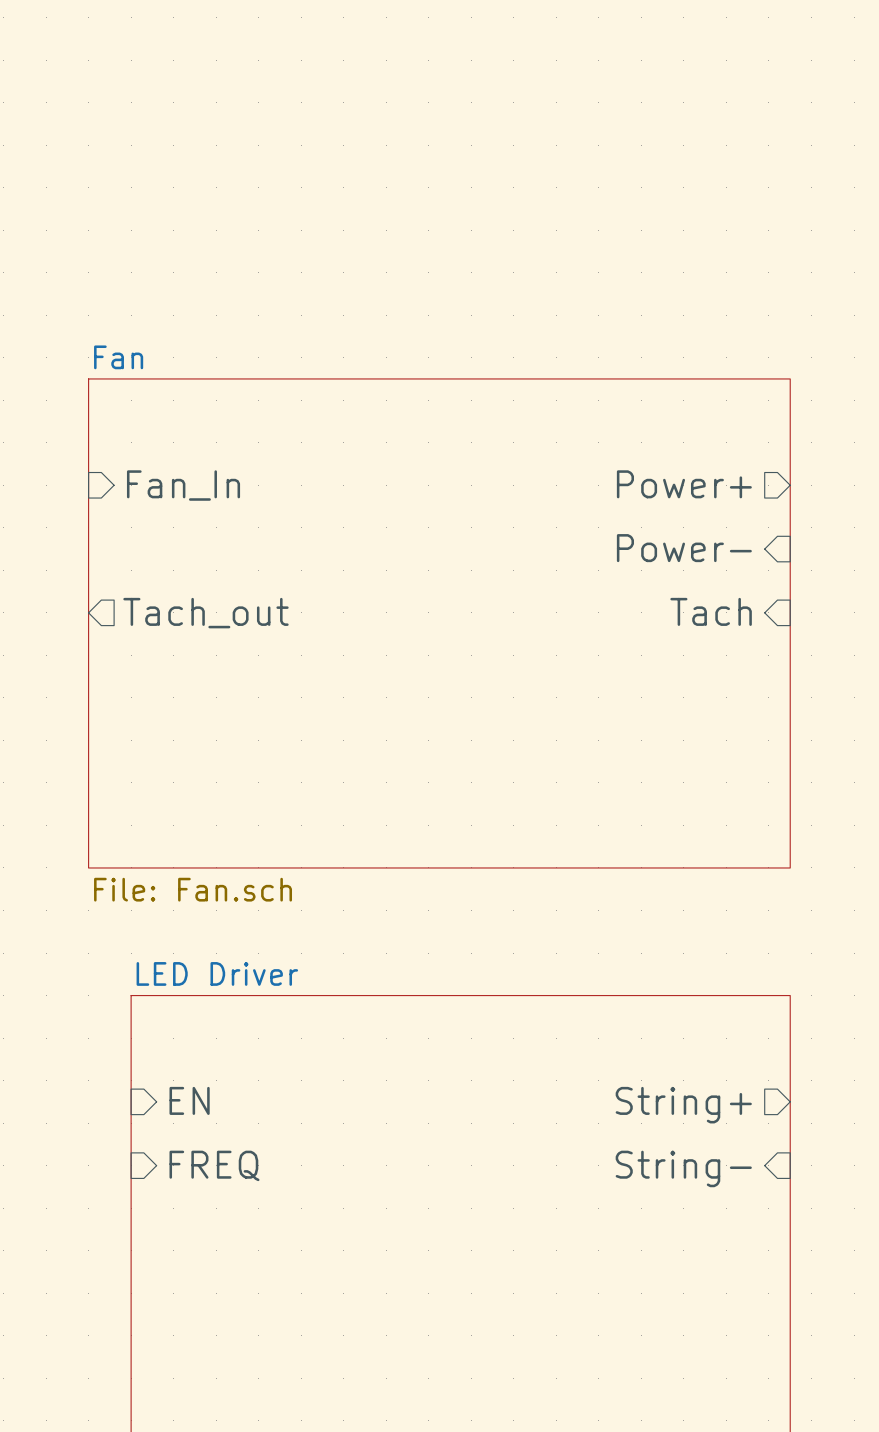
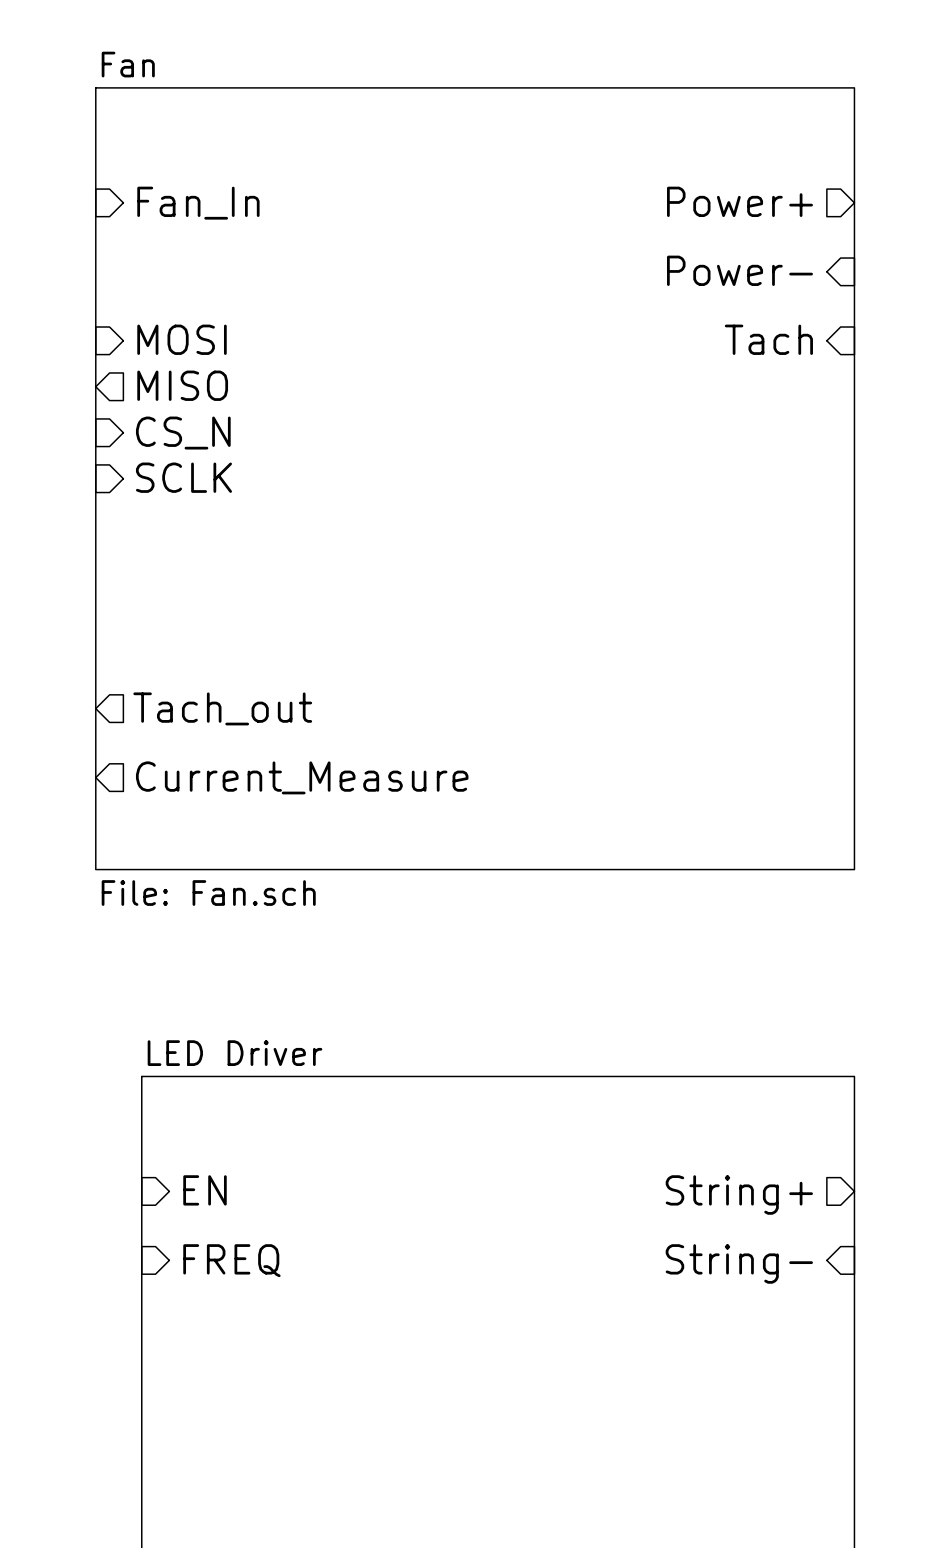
sheet pin: none -> MOSI (182, 339)
sheet pin: none -> MISO (182, 385)
sheet pin: none -> CS_N (183, 433)
sheet pin: none -> SCLK (183, 477)
sheet Fan: none -> File: Fan.sch (475, 478)
sheet pin position: Power+ (684, 484) -> Power+ (739, 201)
sheet pin position: Fan_In (183, 485) -> Fan_In (198, 203)
sheet pin position: Power- (684, 548) -> Power- (739, 270)
sheet pin position: Tach (711, 611) -> Tach (768, 339)
sheet pin position: Tach_out (205, 613) -> Tach_out (222, 708)
sheet Fan: File: Fan.sch (439, 623) -> none
sheet pin: none -> Current_Measure (302, 777)

